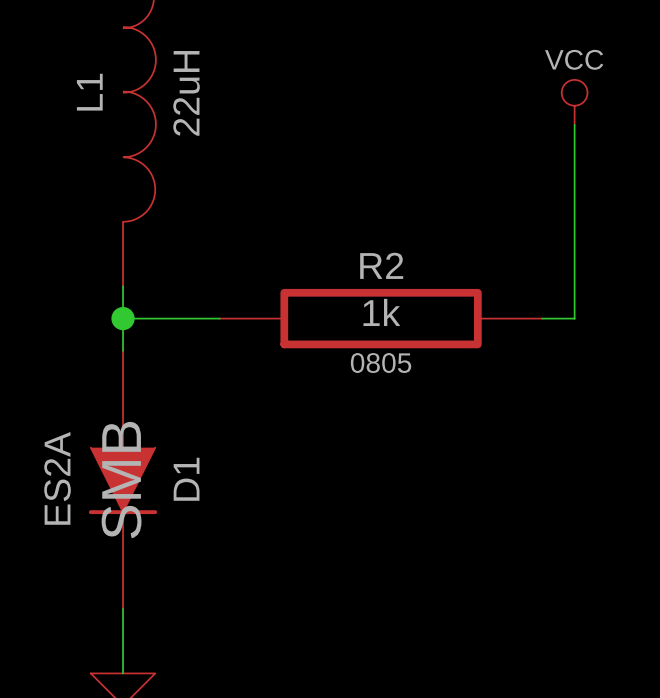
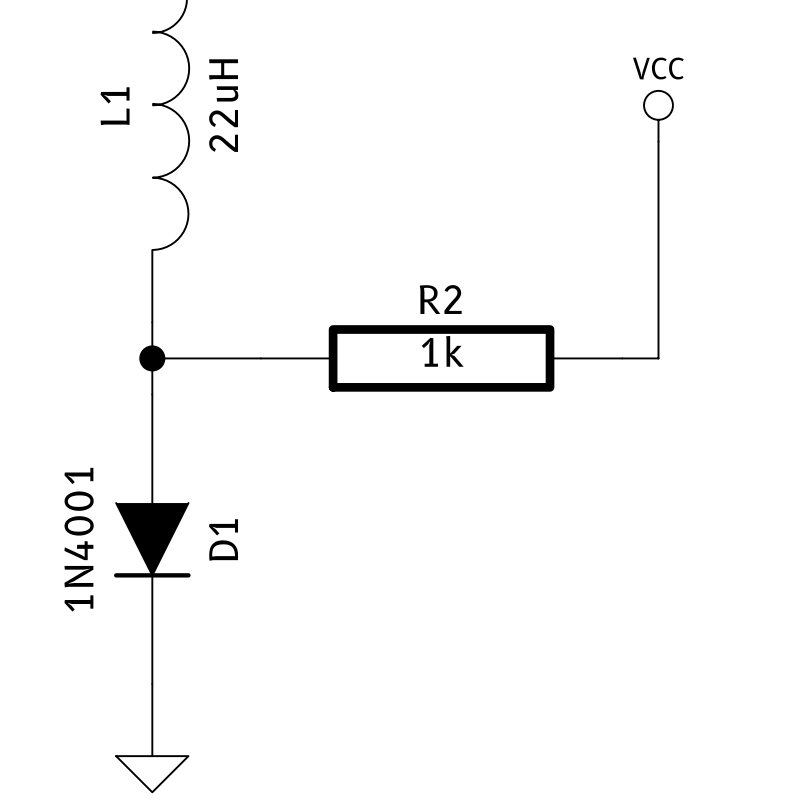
R2 text: 0805 (381, 363) -> none
D1 value: ES2A (57, 478) -> 1N4001 (79, 539)
D1 text: SMB (121, 480) -> none

